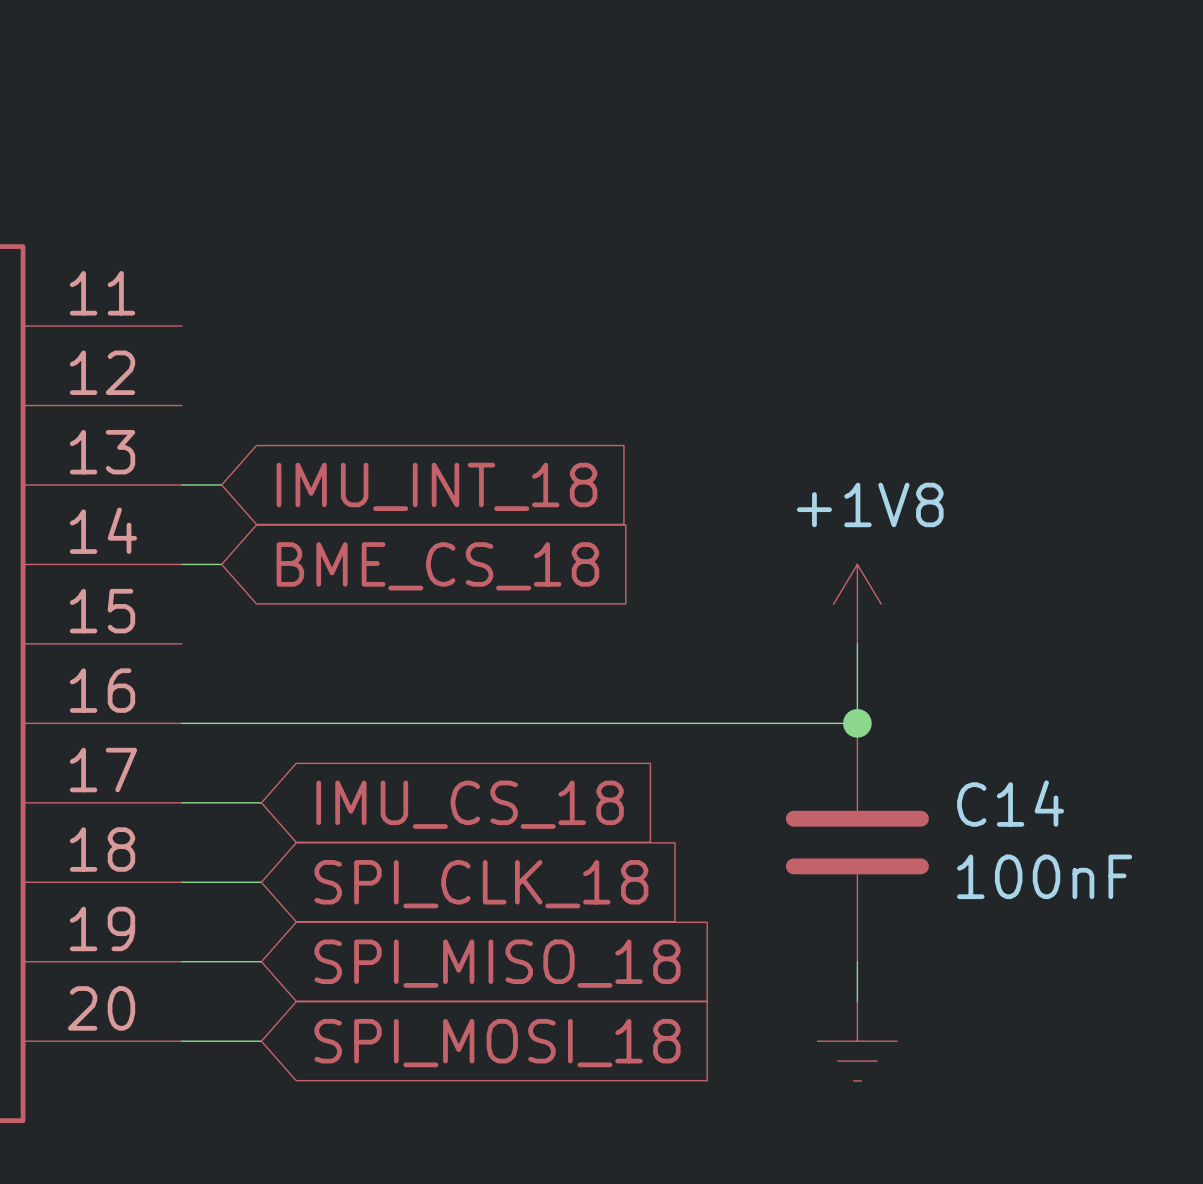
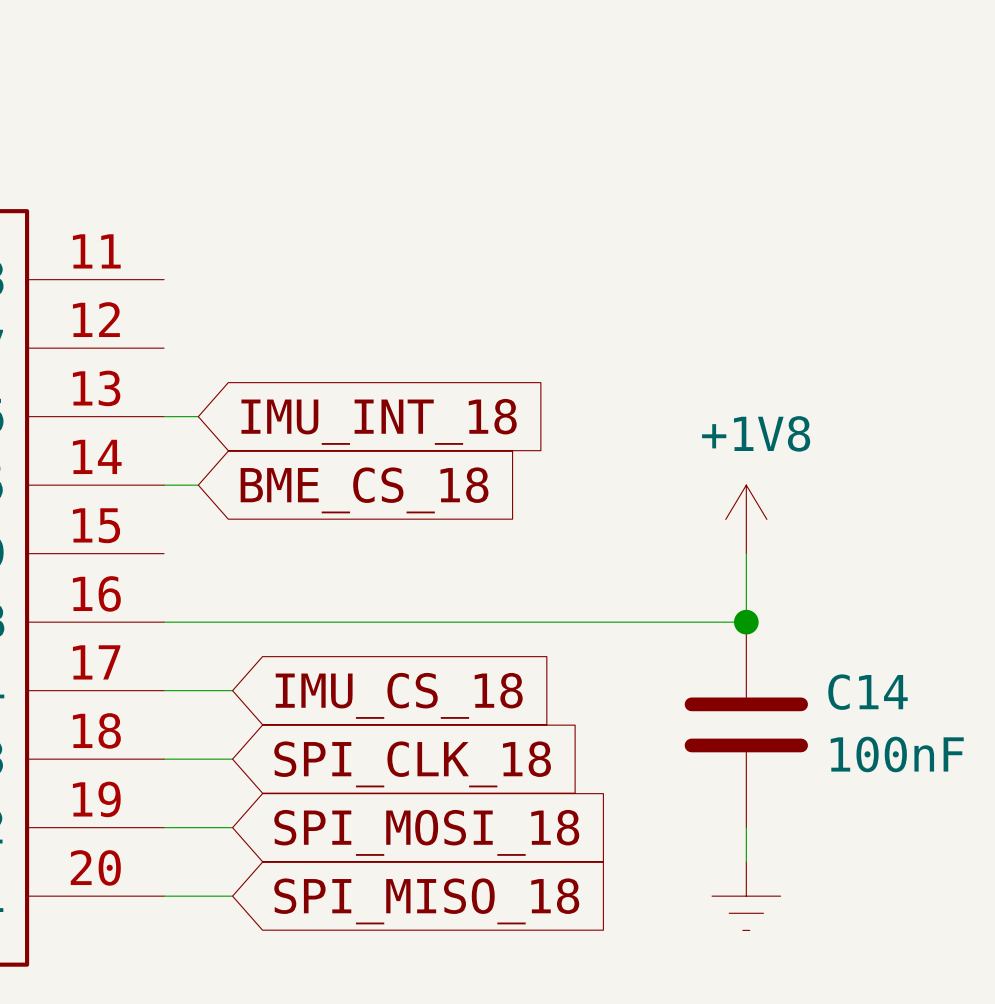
global label: SPI_MISO_18 (497, 963) -> SPI_MOSI_18 (426, 832)
global label: SPI_MOSI_18 (497, 1043) -> SPI_MISO_18 (426, 901)

